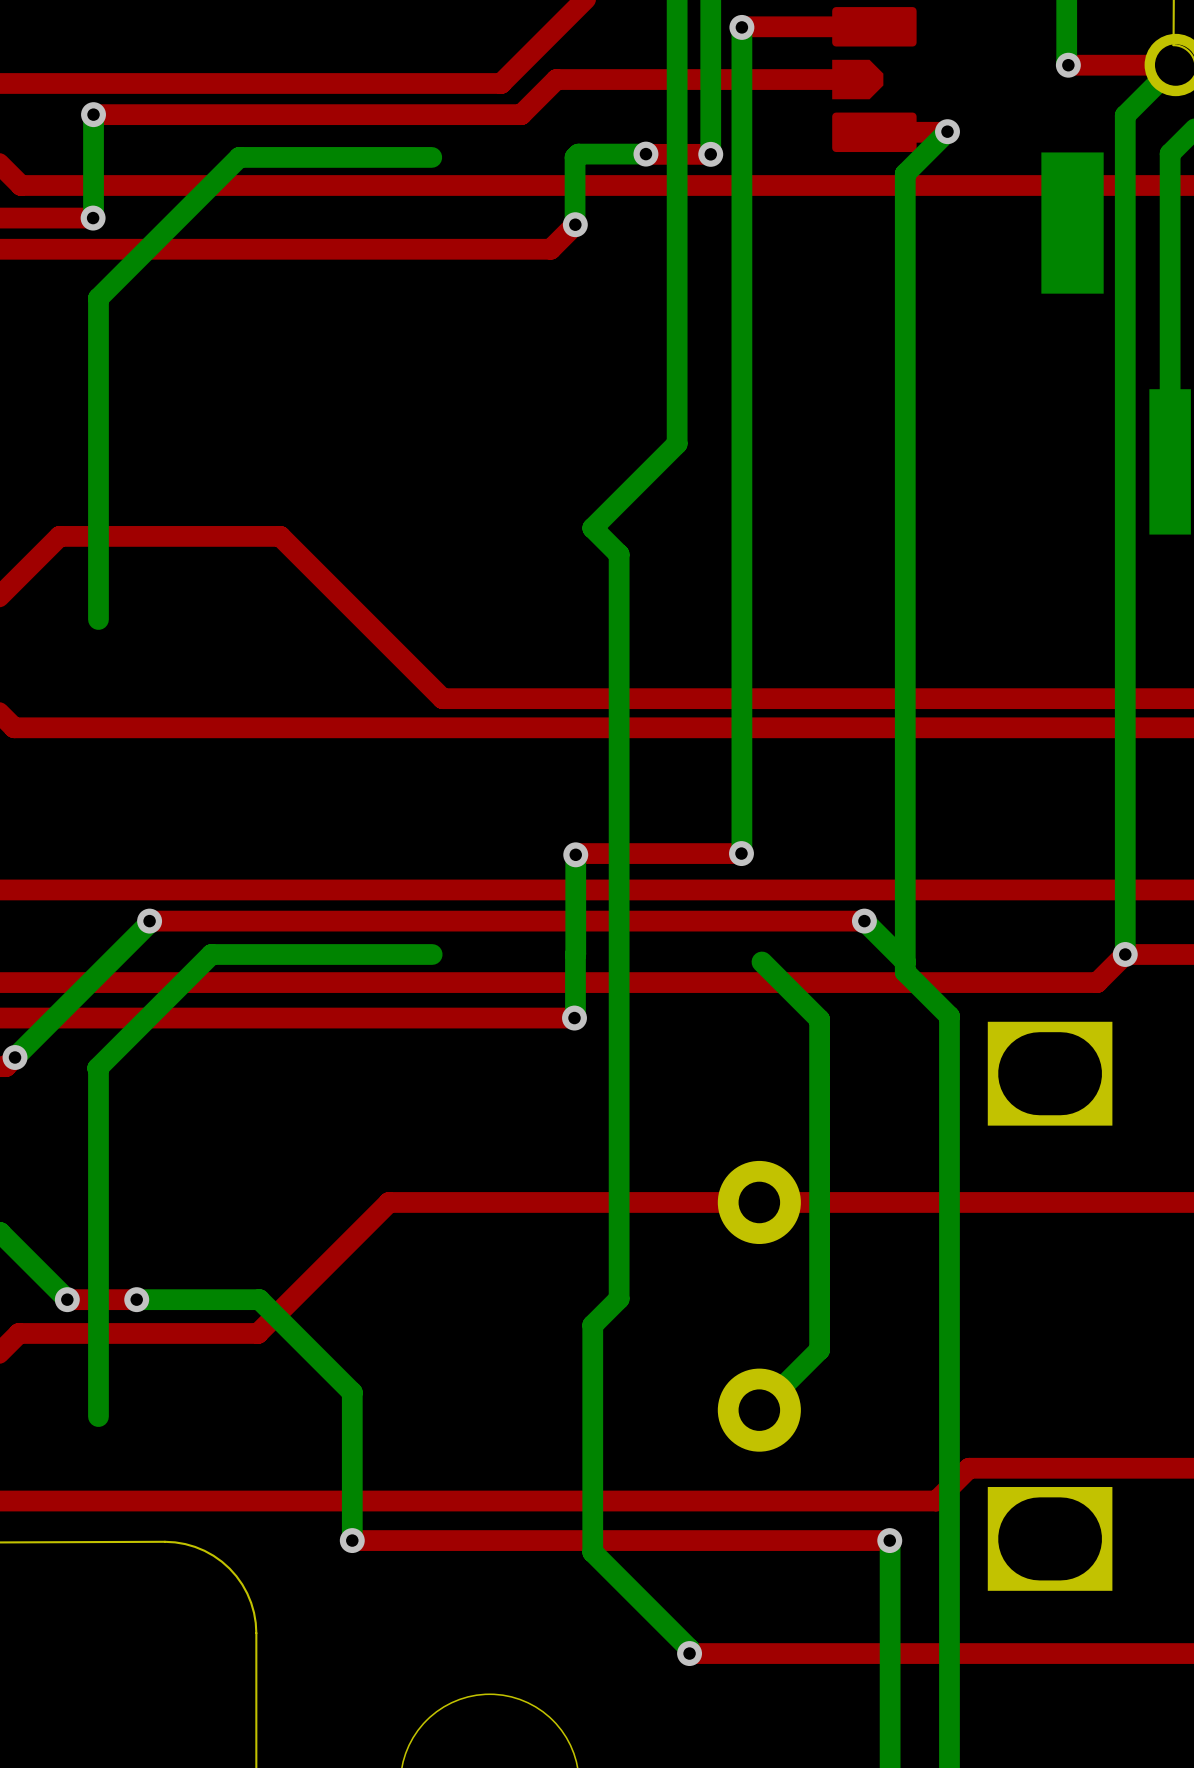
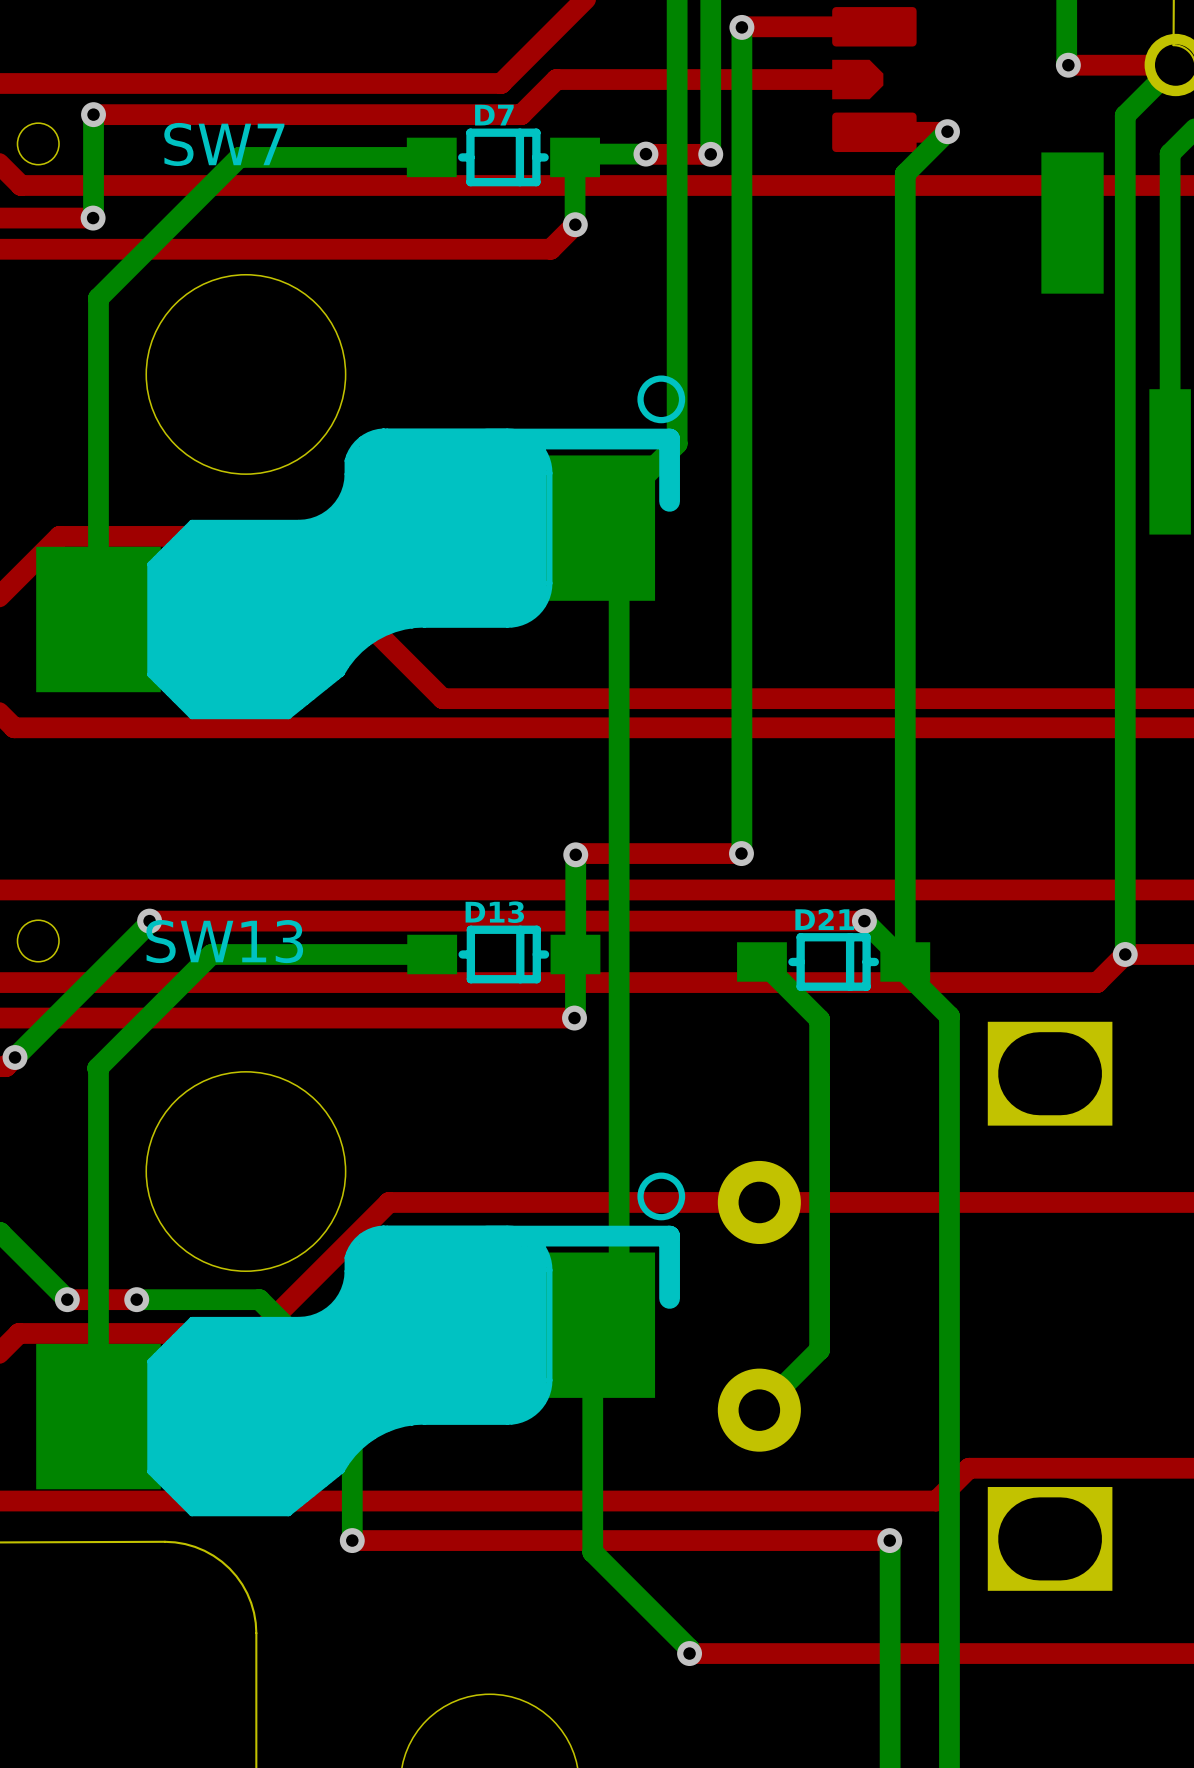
D7: none -> (503, 157)
SW7: none -> (351, 421)
D13: none -> (503, 954)
D21: none -> (833, 961)
SW13: none -> (351, 1218)

